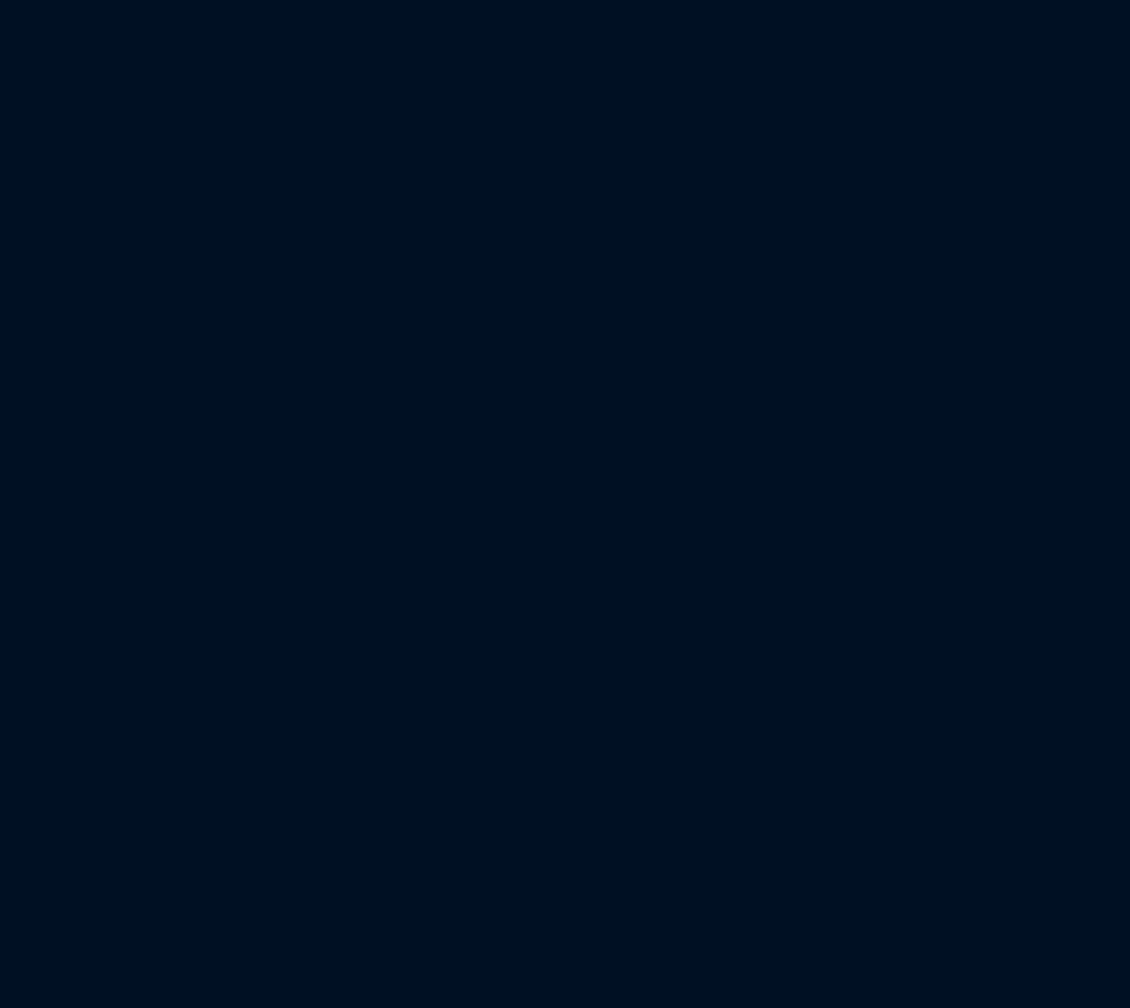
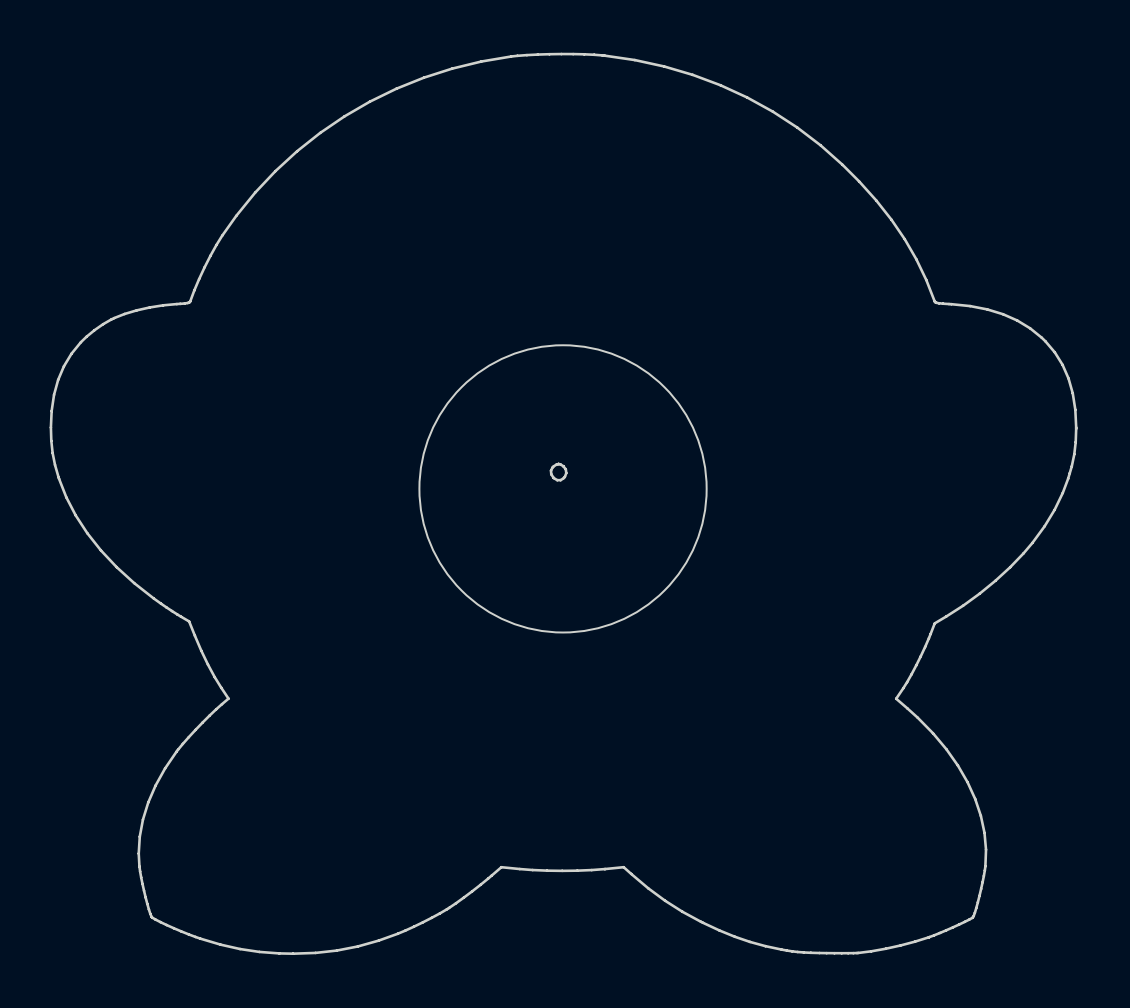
drawing: none -> [49, 52, 1078, 955]
round board edge: none -> [418, 344, 708, 634]

